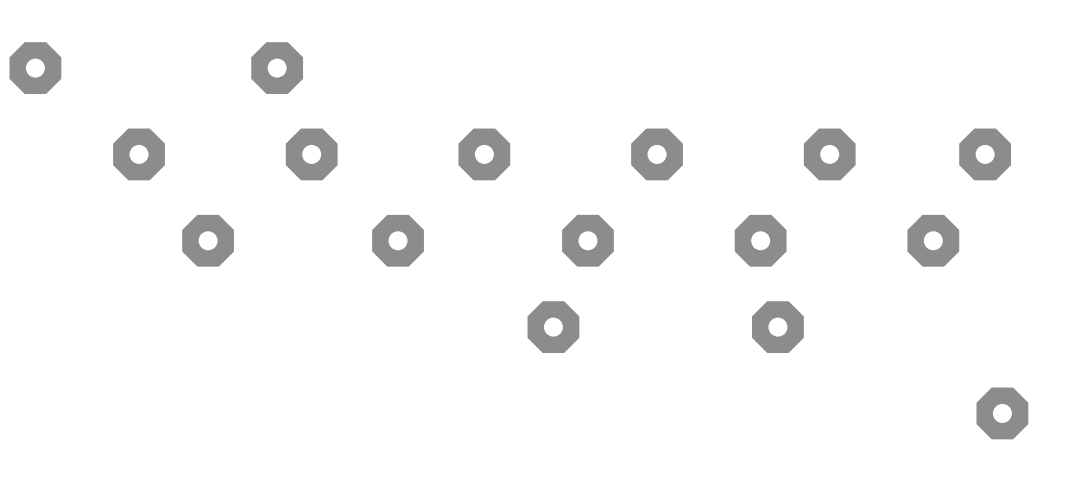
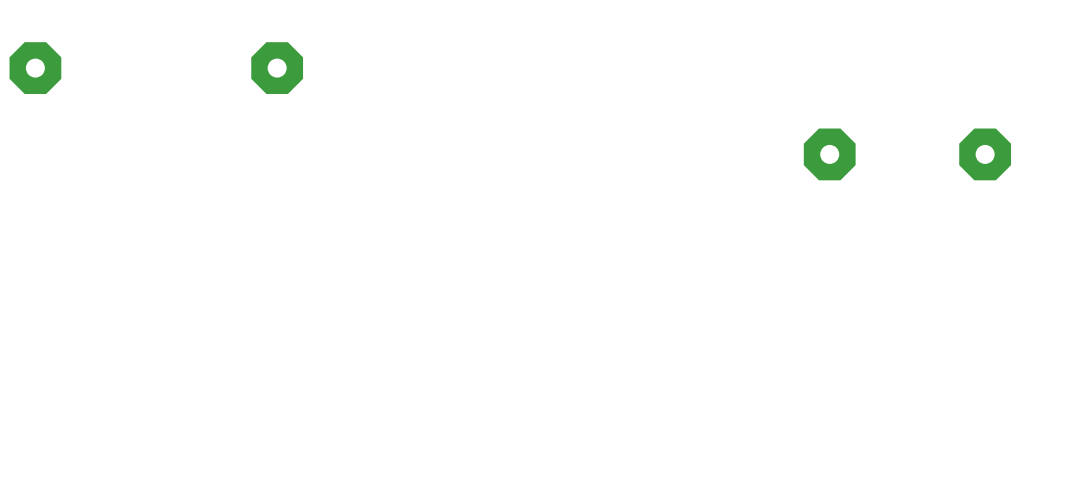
part: (139, 154) -> none
part: (311, 154) -> none
part: (484, 154) -> none
part: (657, 154) -> none
part: (208, 240) -> none
part: (398, 240) -> none
part: (587, 240) -> none
part: (760, 240) -> none
part: (933, 240) -> none
part: (553, 327) -> none
part: (777, 327) -> none
part: (1002, 413) -> none

